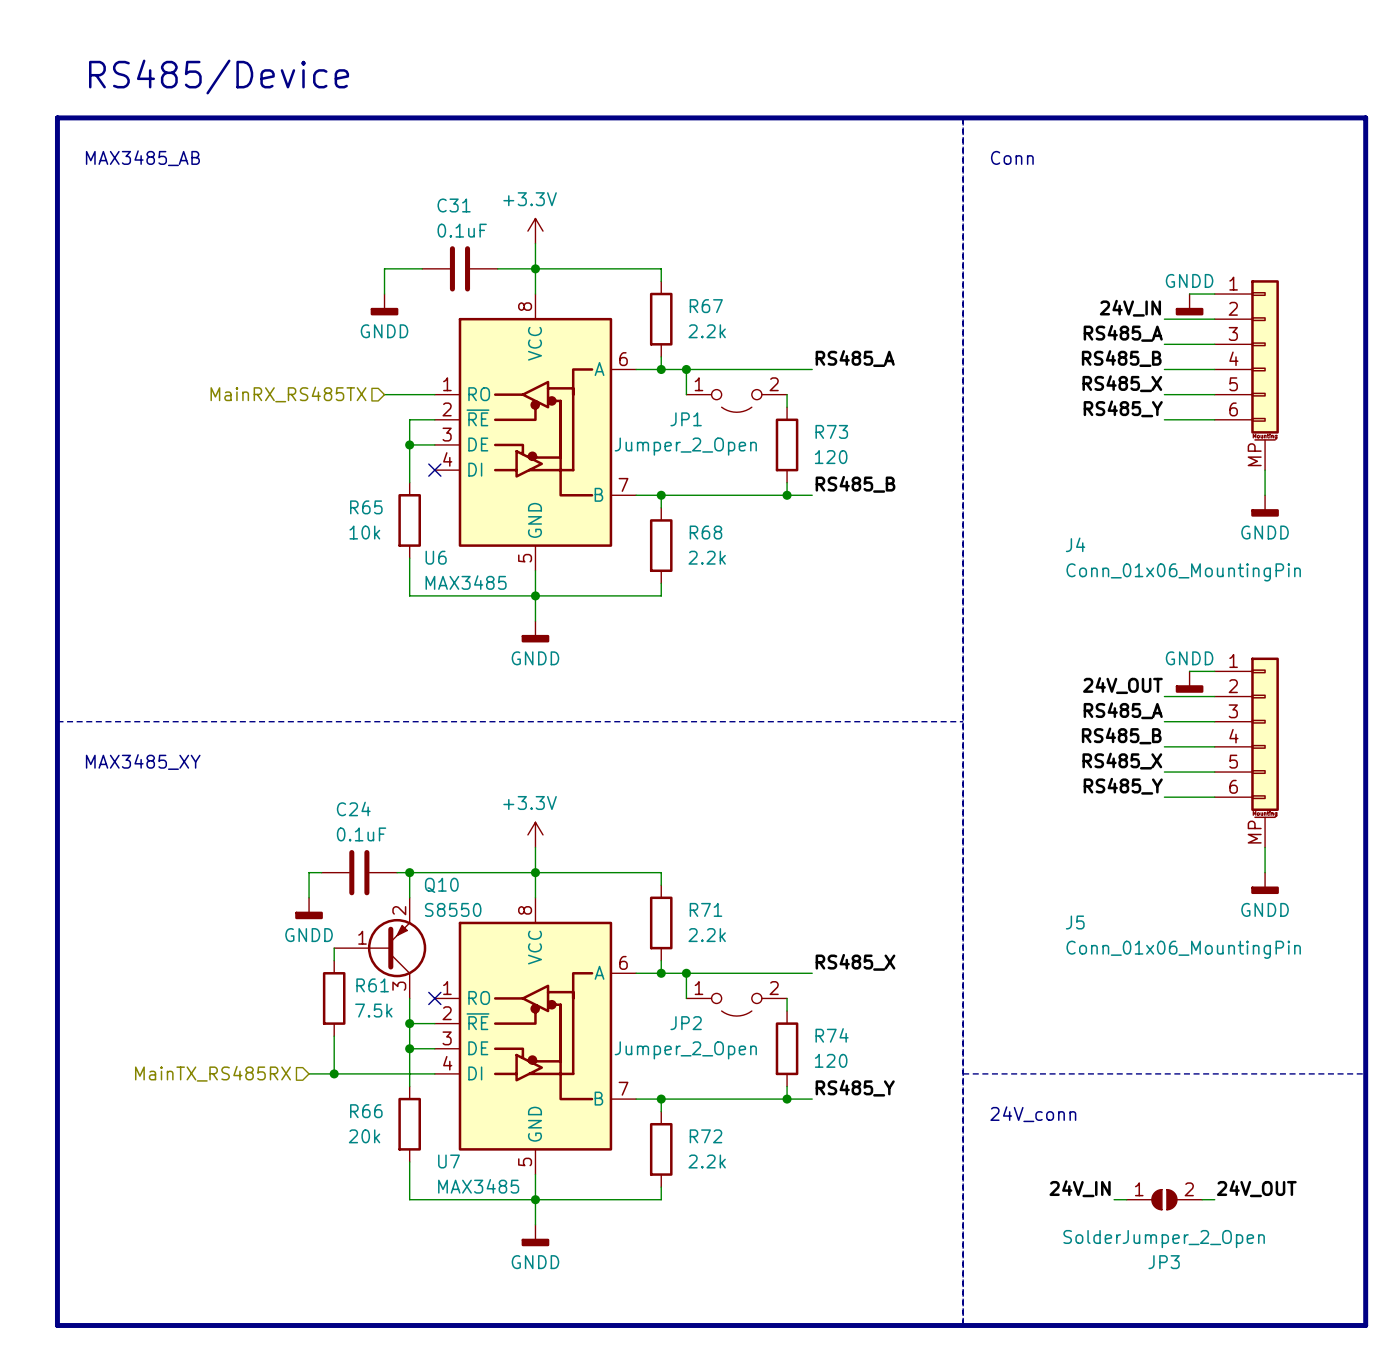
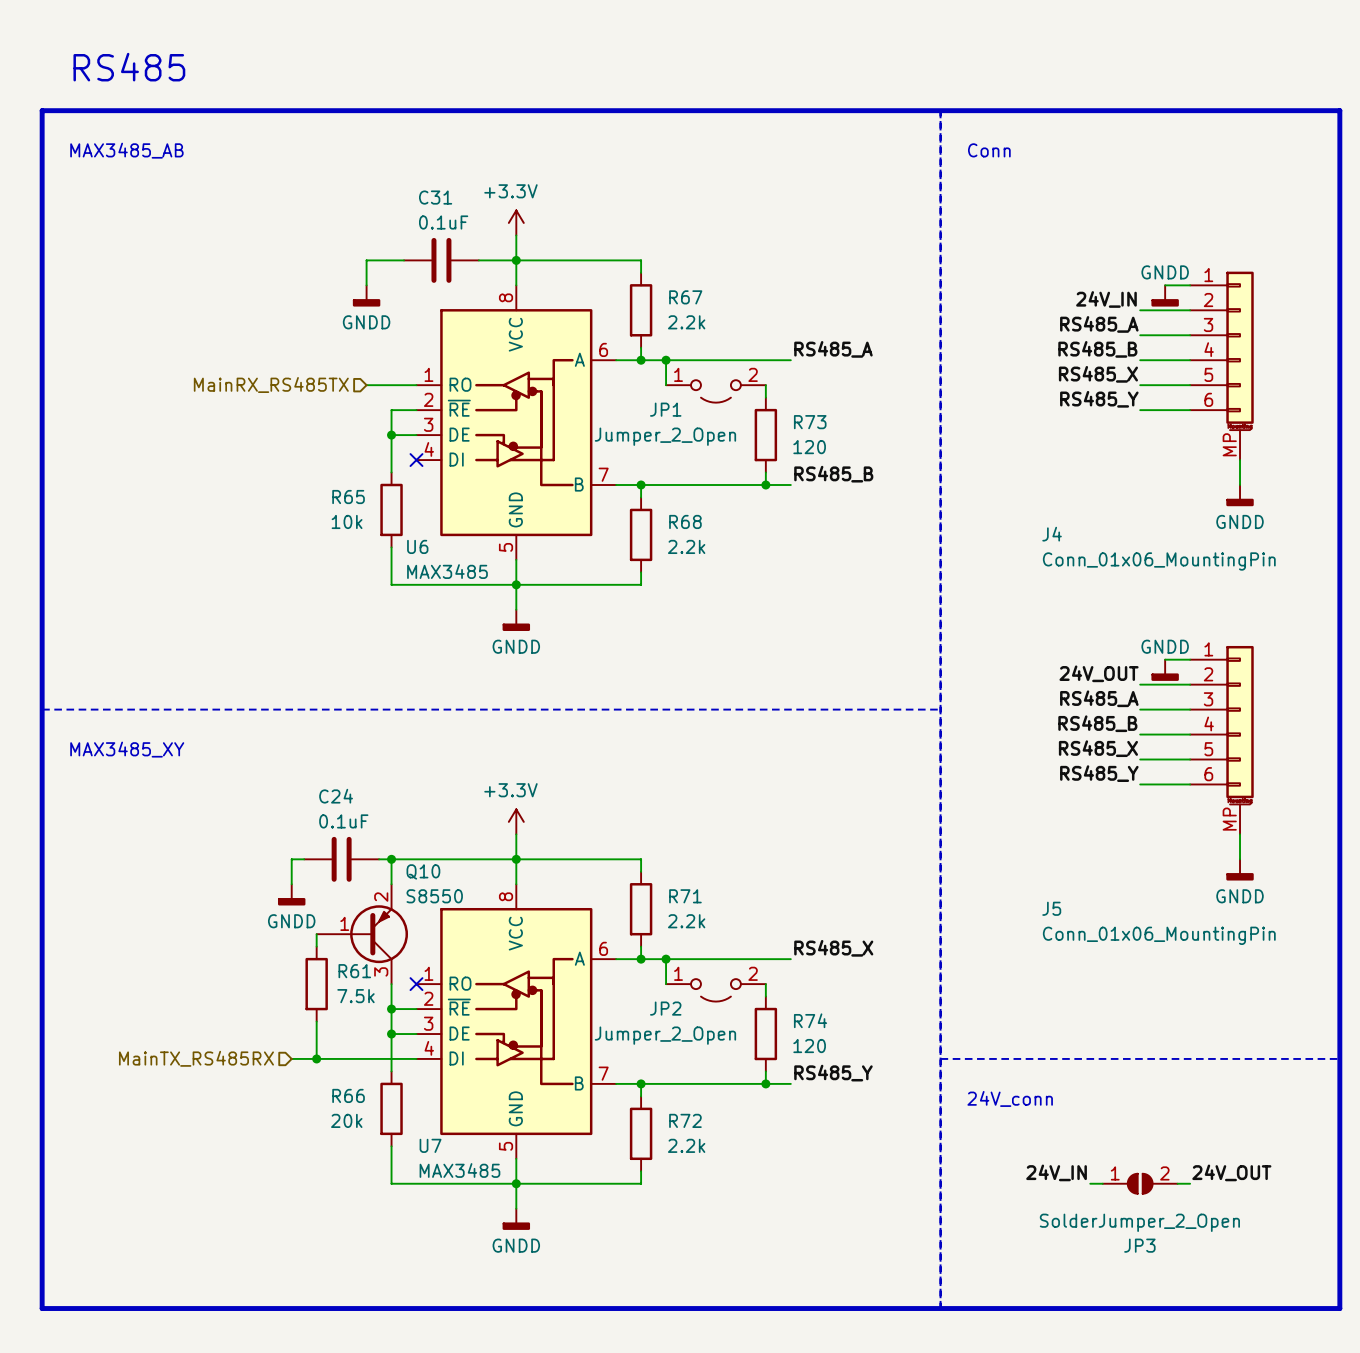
text: RS485/Device (219, 77) -> RS485 (129, 67)

